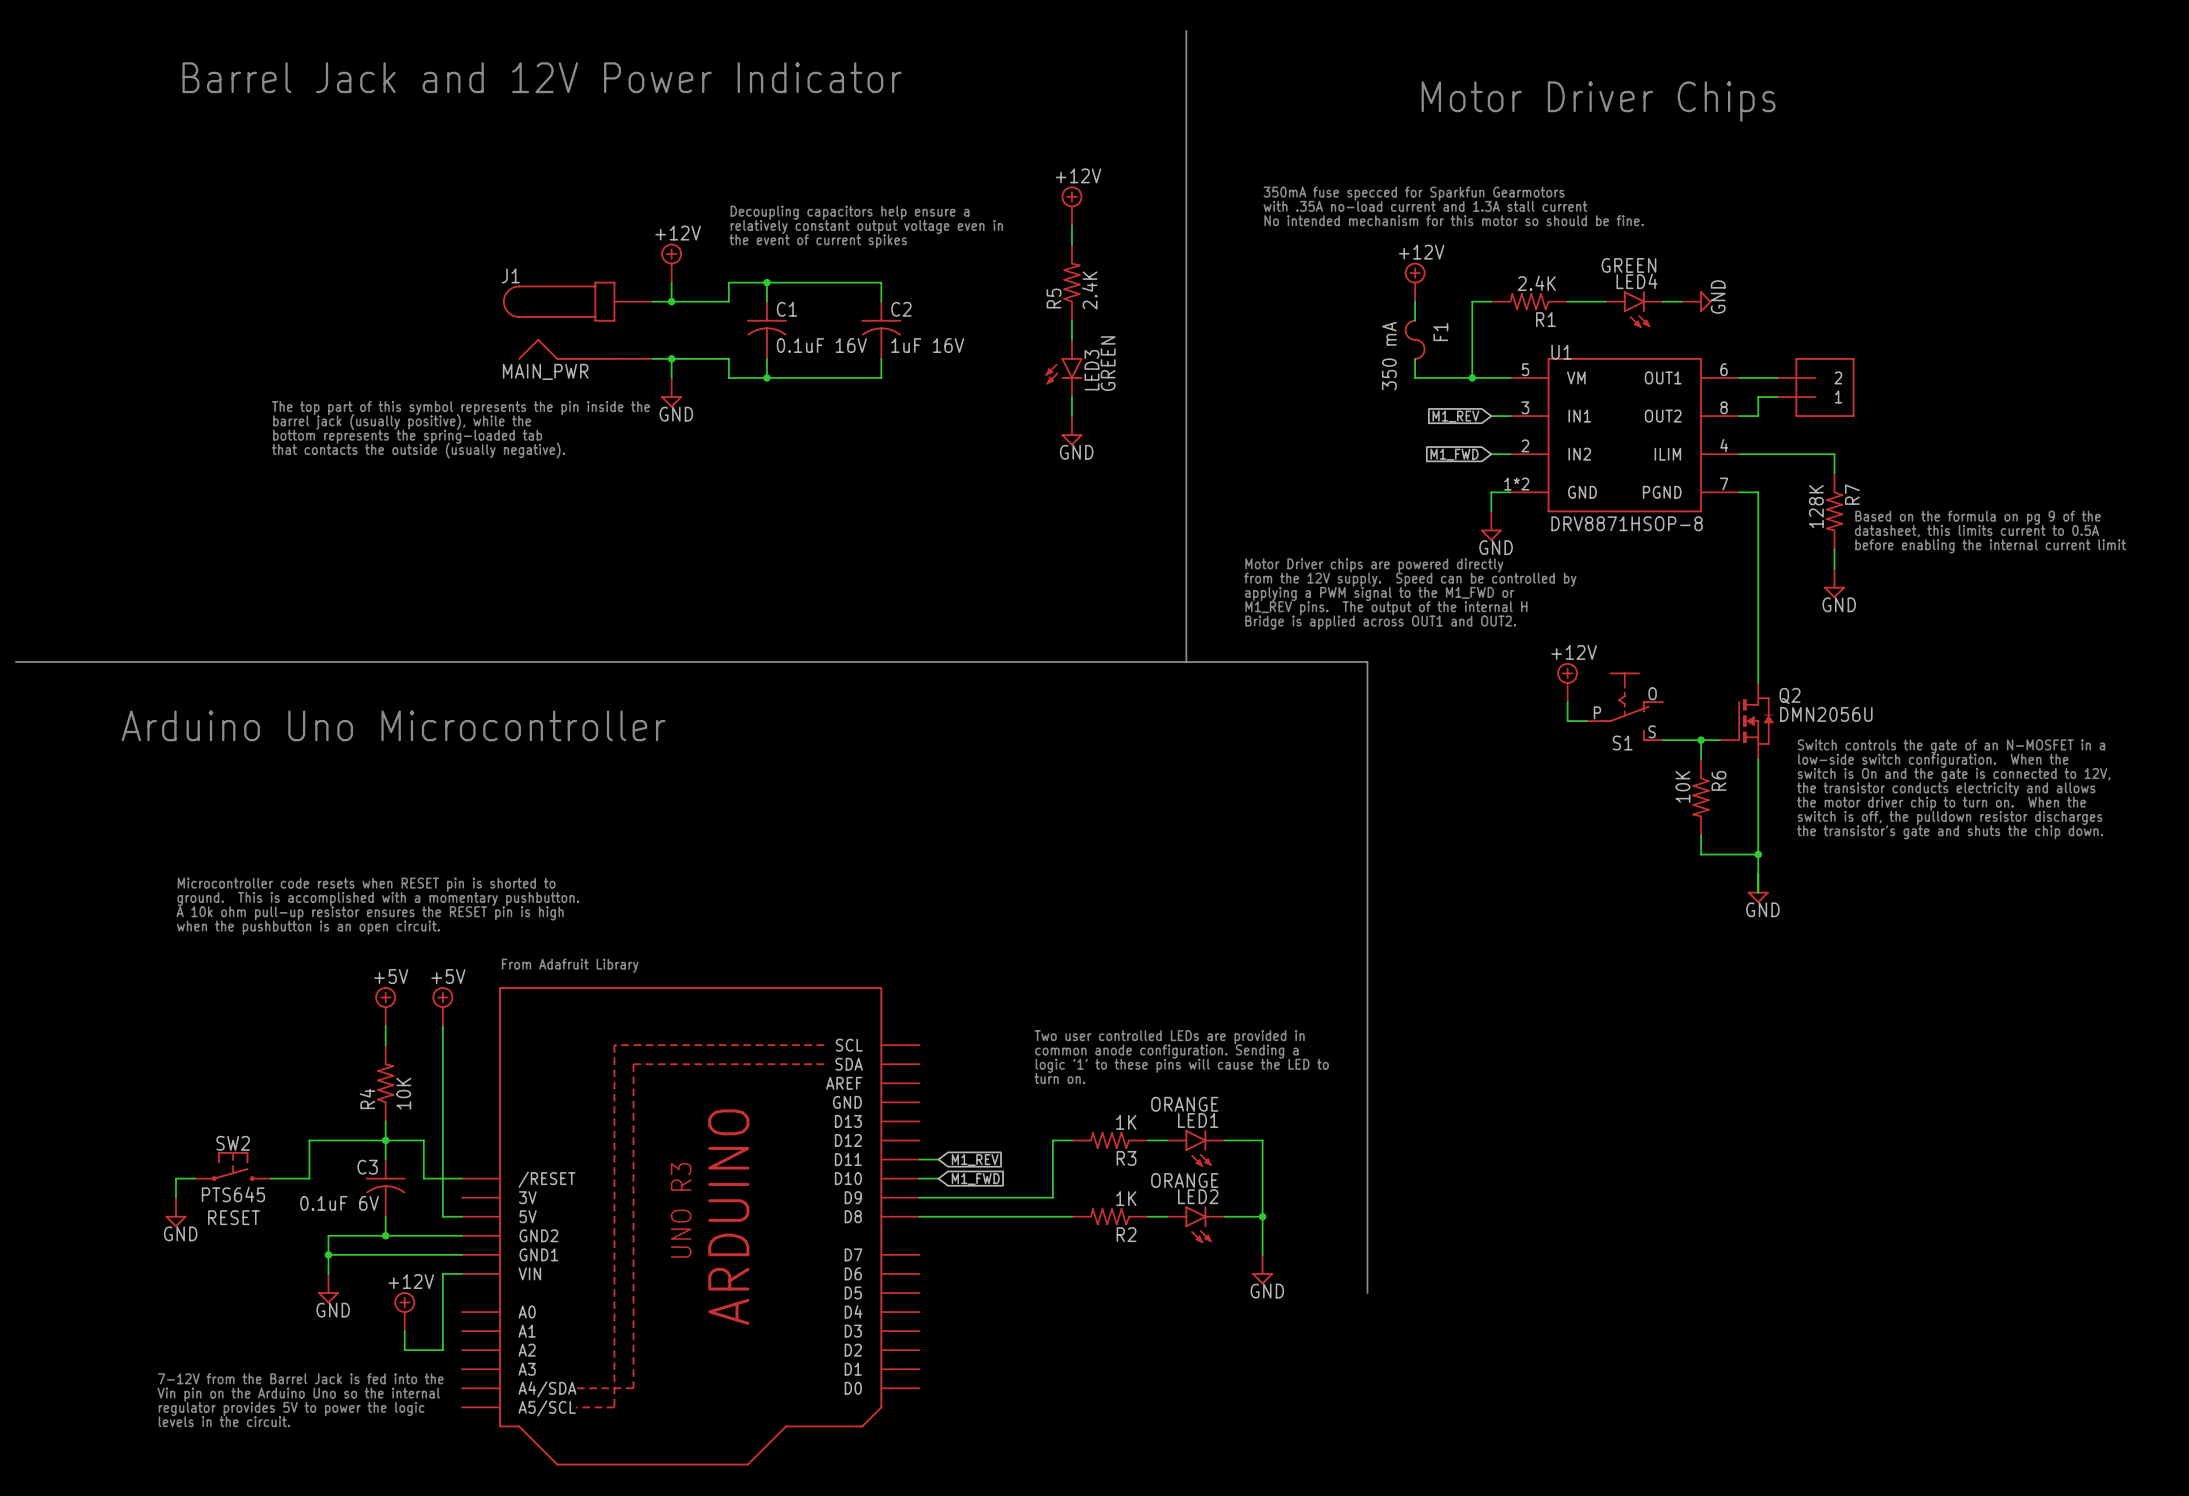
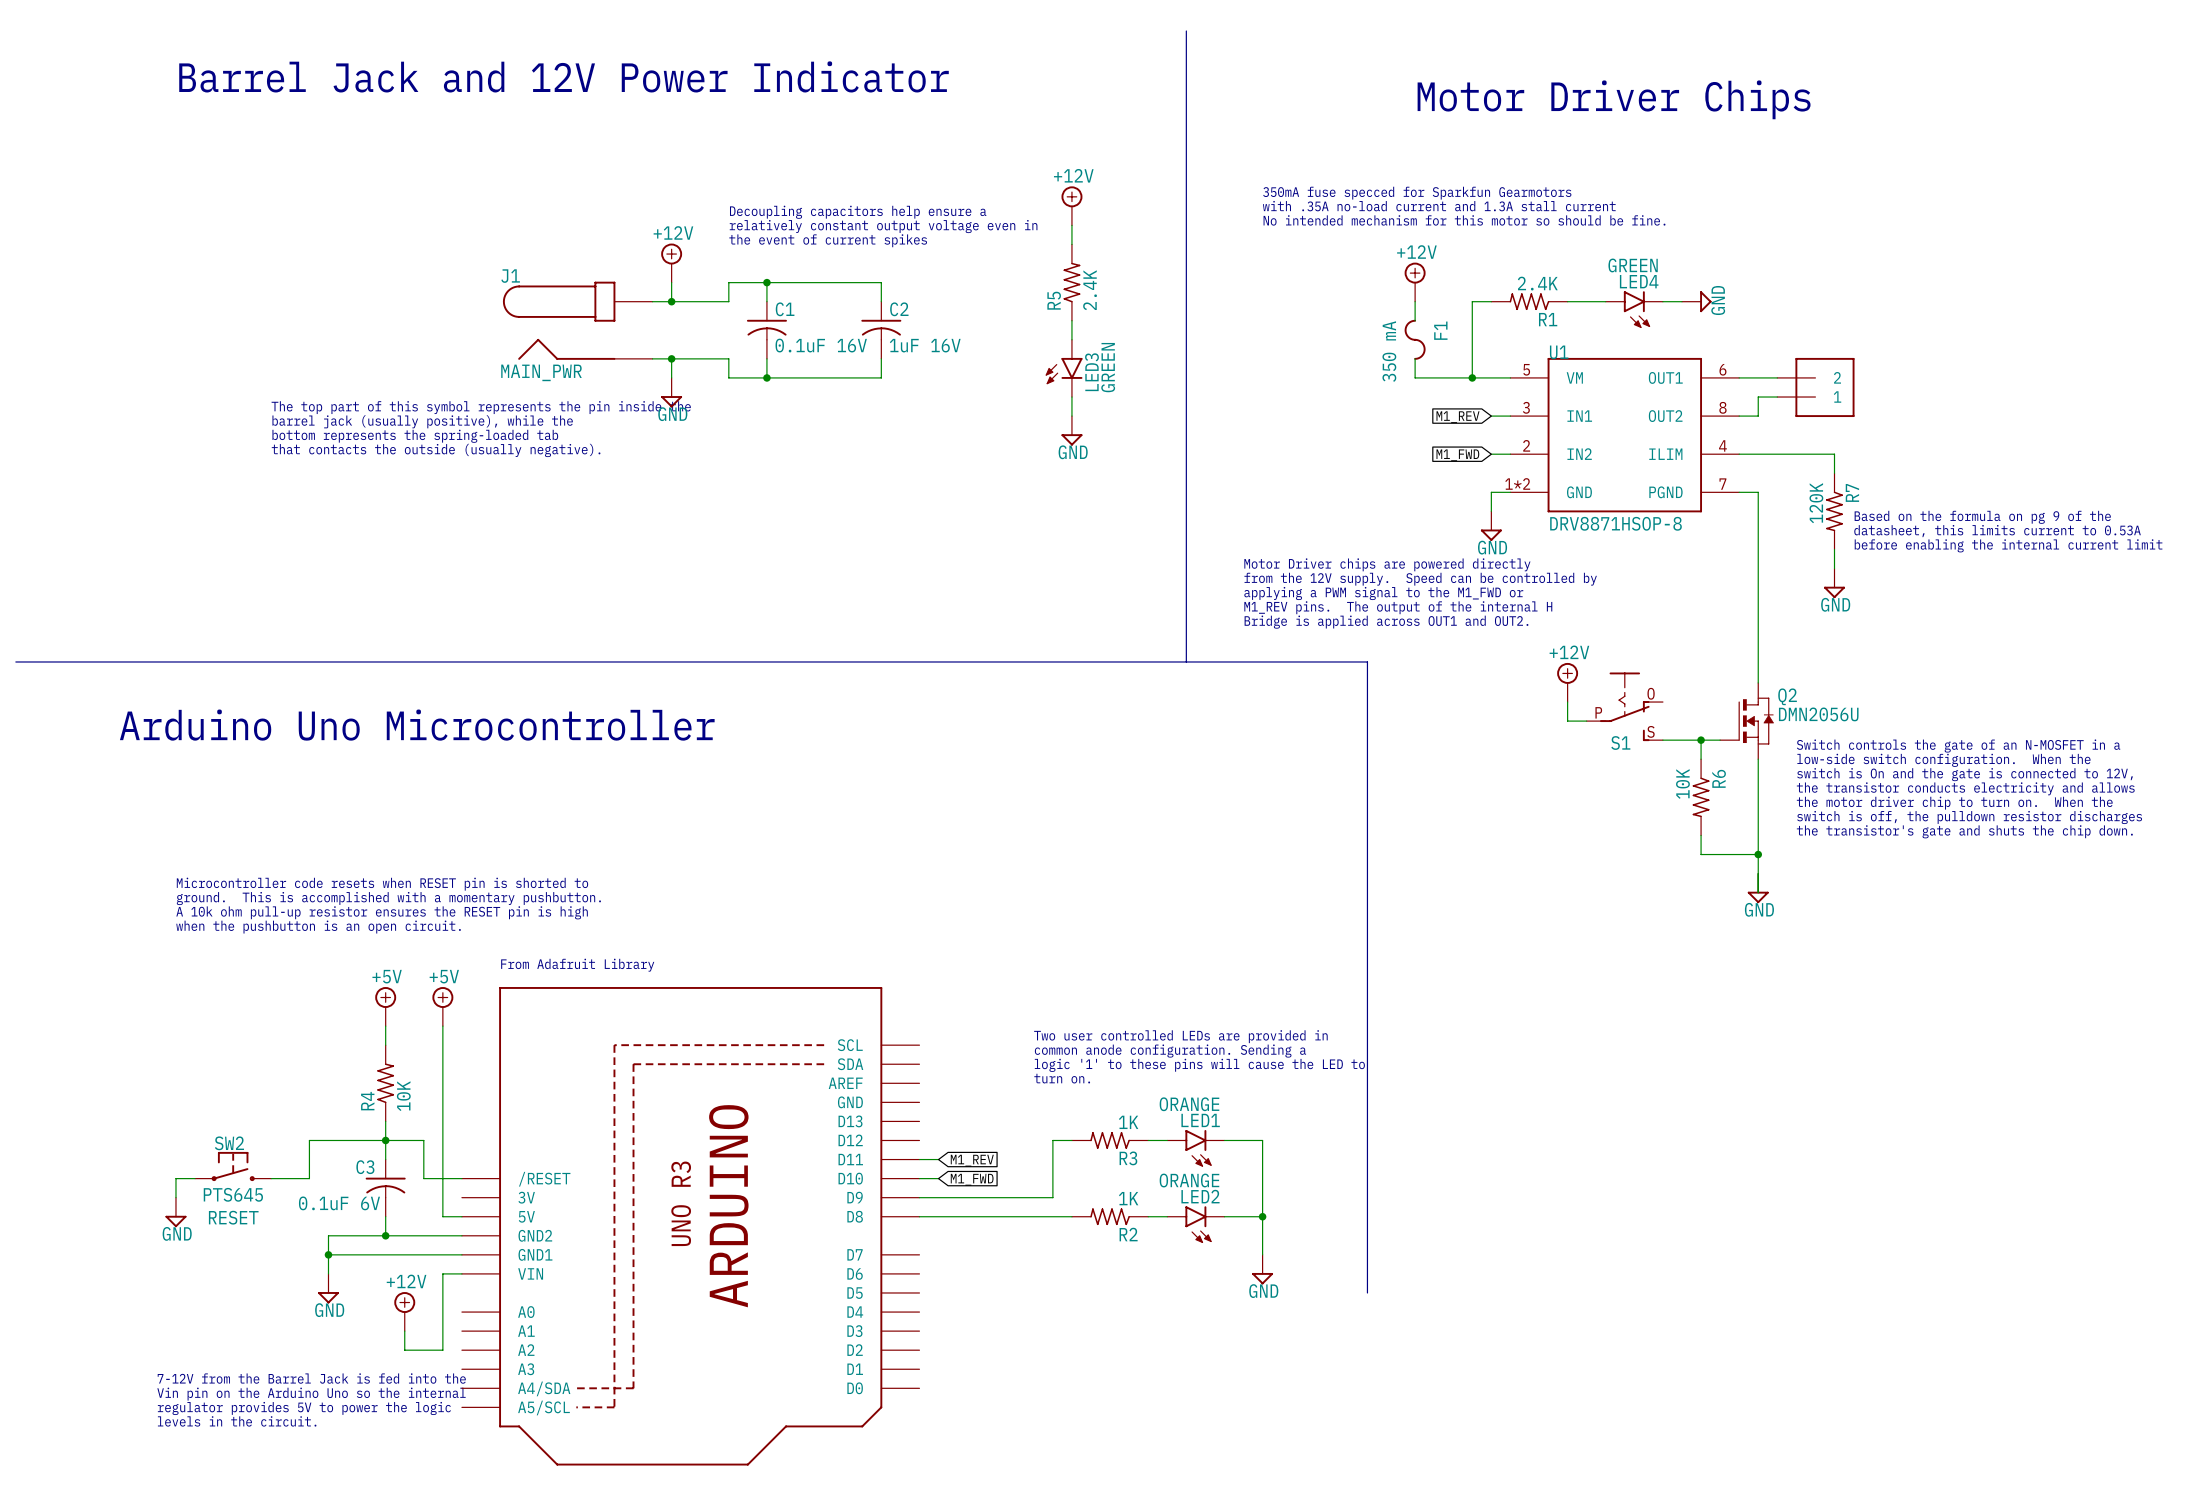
R7 value: 128K (1816, 506) -> 120K (1816, 503)
text: datasheet, this limits current to 0.5A (1977, 531) -> datasheet, this limits current to 0.53A (1997, 531)

